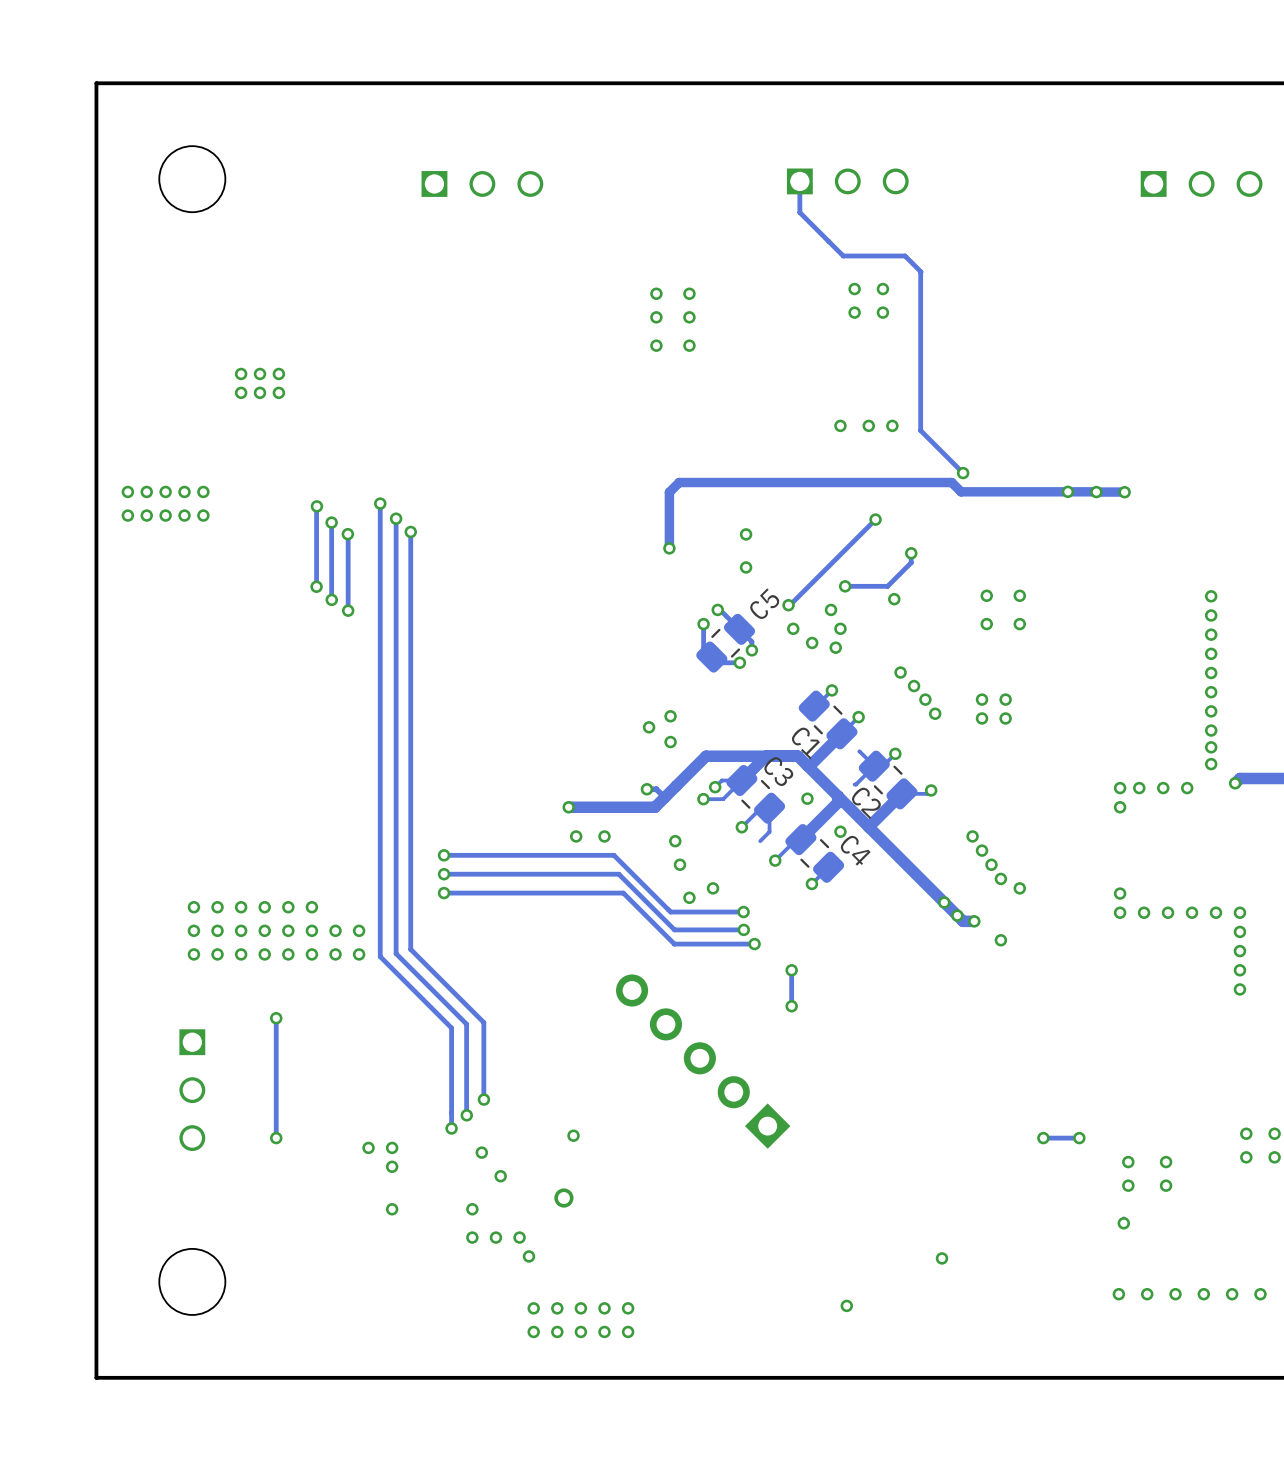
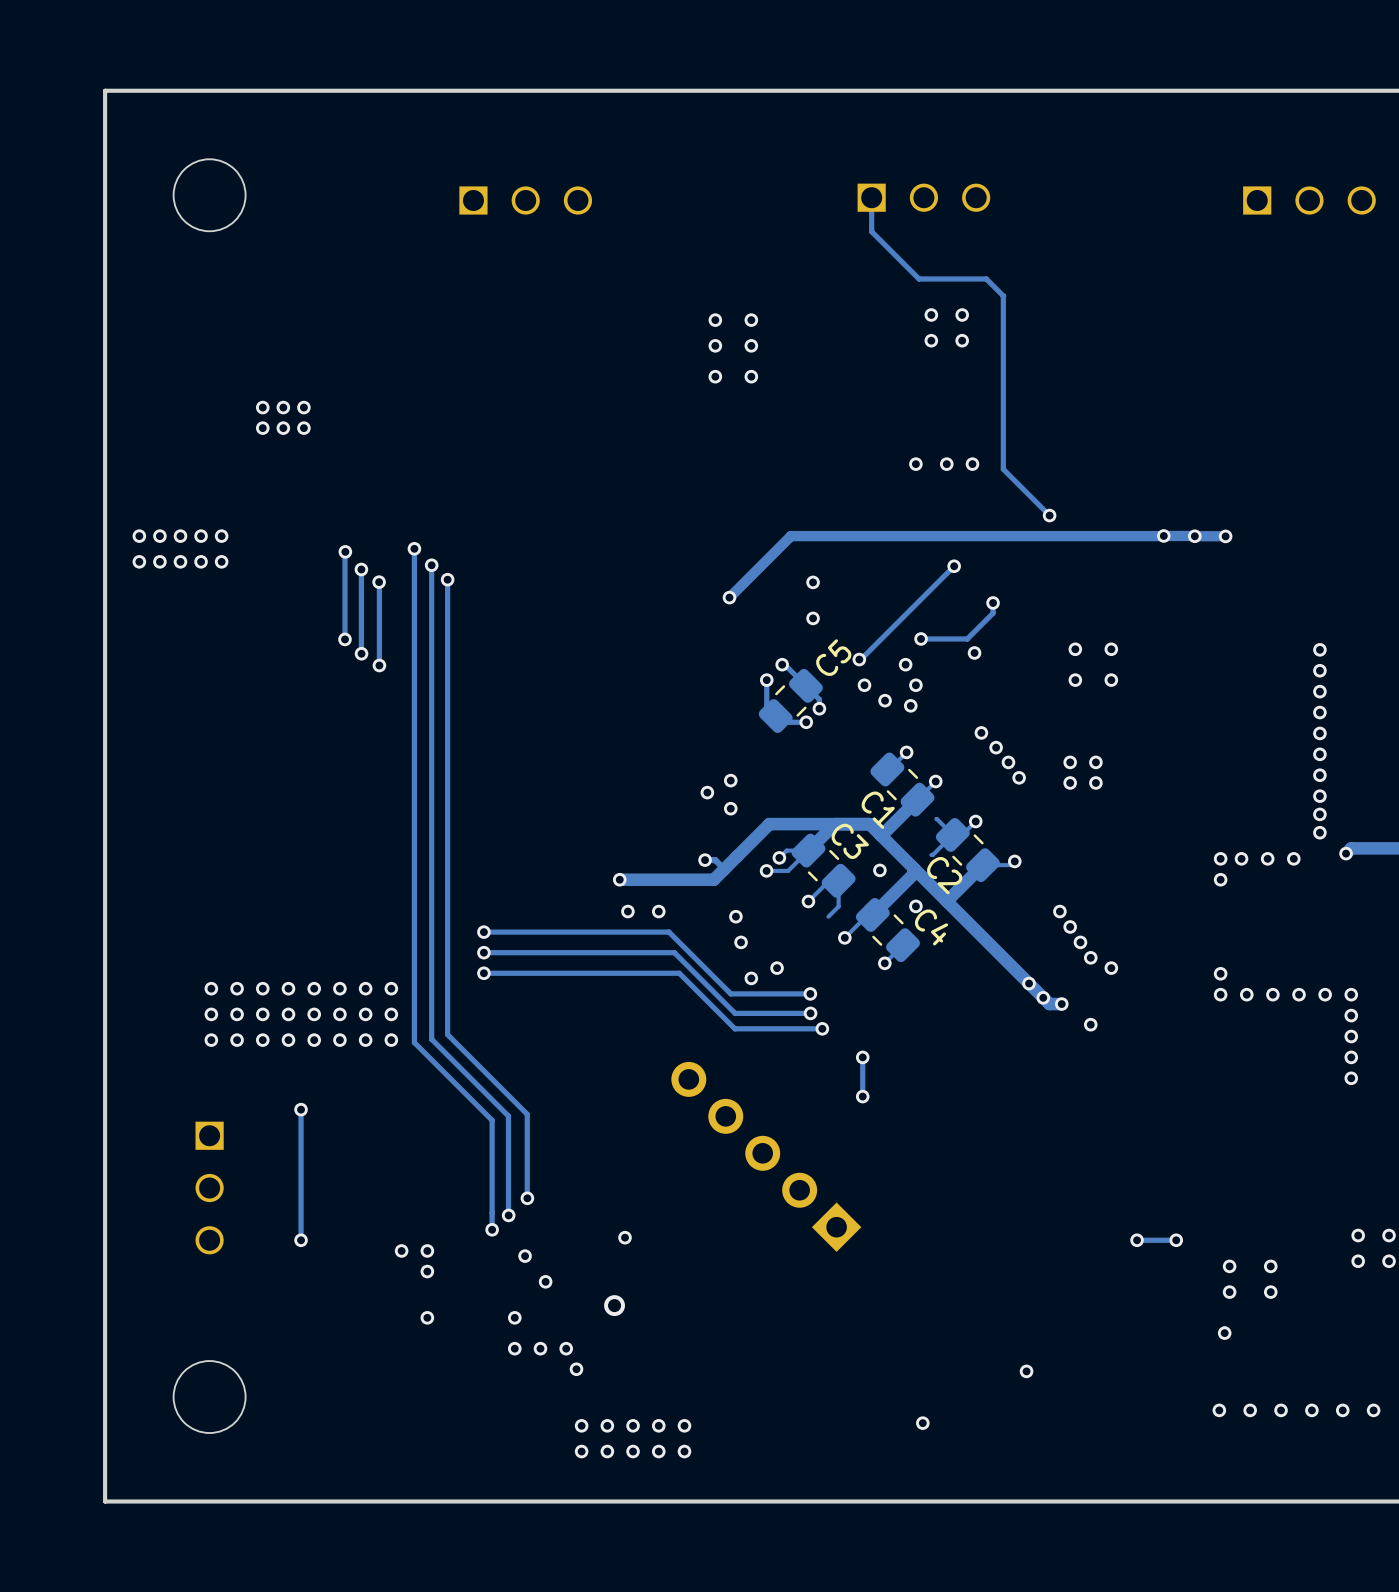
track: (1067, 491) (961, 491) (951, 482) (679, 482) (669, 492) (669, 548) -> (1163, 536) (790, 536) (729, 597)
via: none -> (365, 988)
via: none -> (391, 988)

